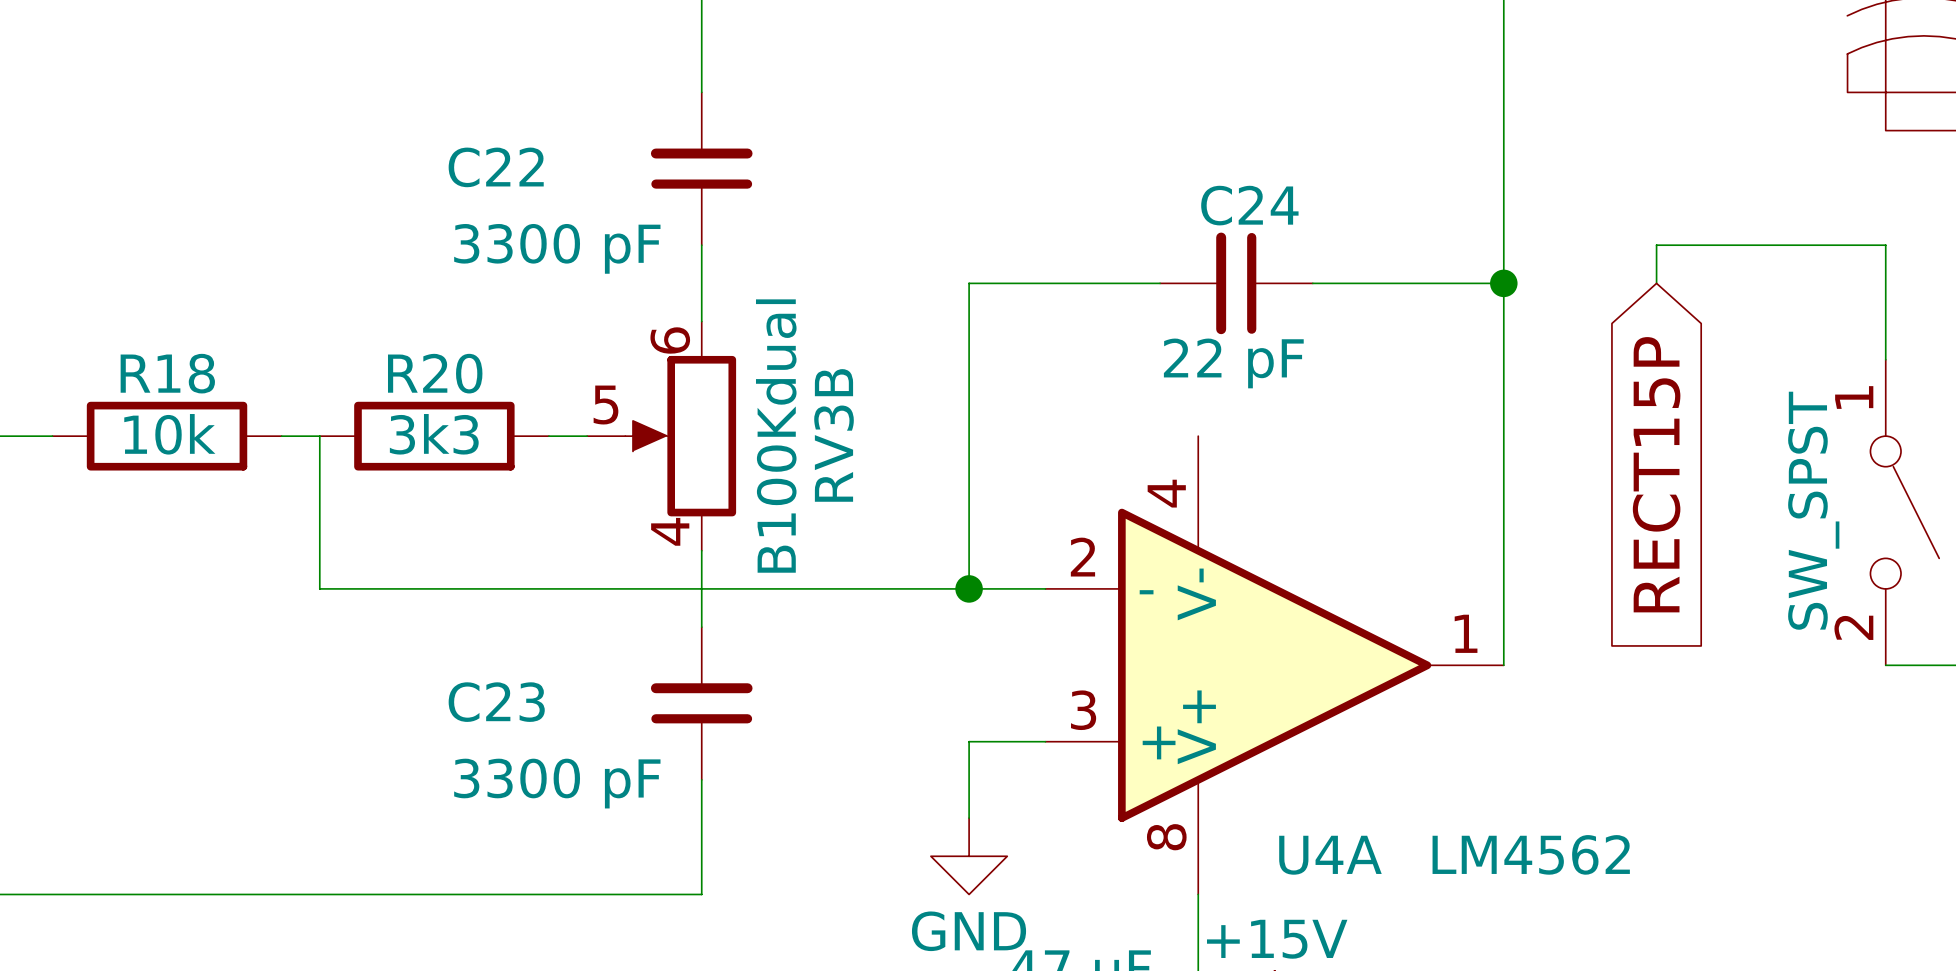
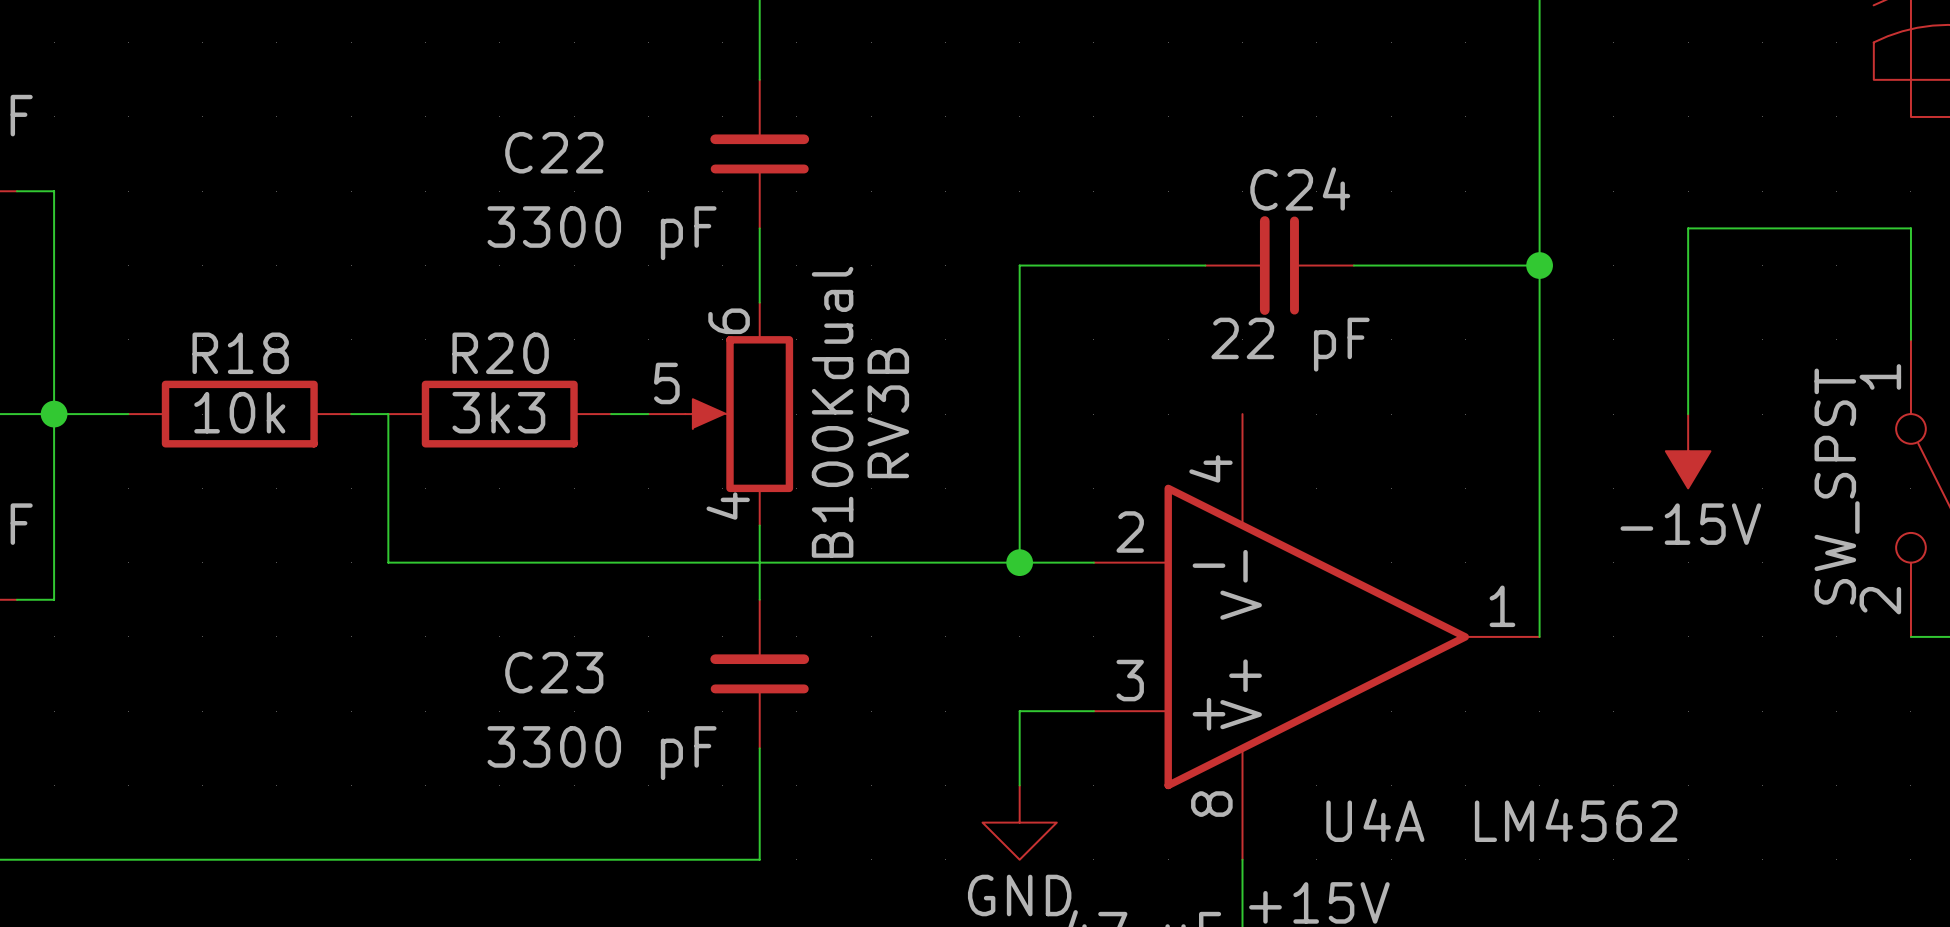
wire: none -> (1688, 265) (1688, 414)
power symbol: none -> -15V (1688, 451)
global label: RECT15P (1656, 474) -> none

